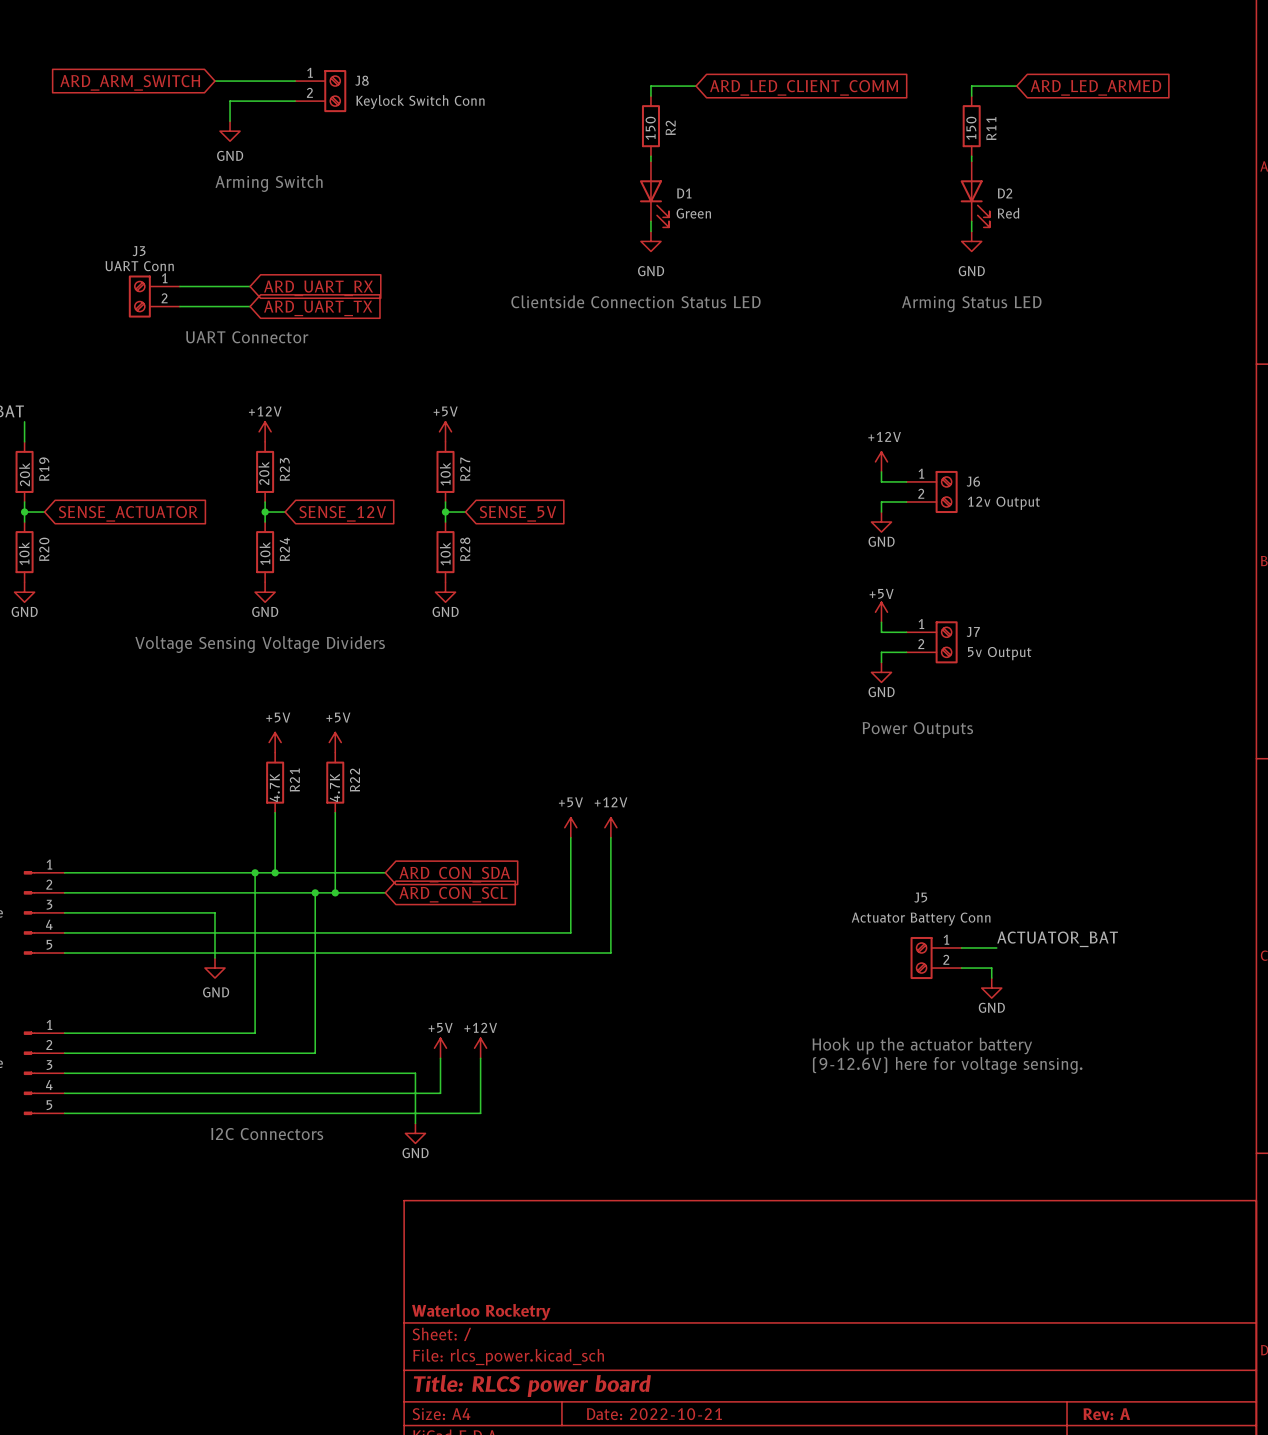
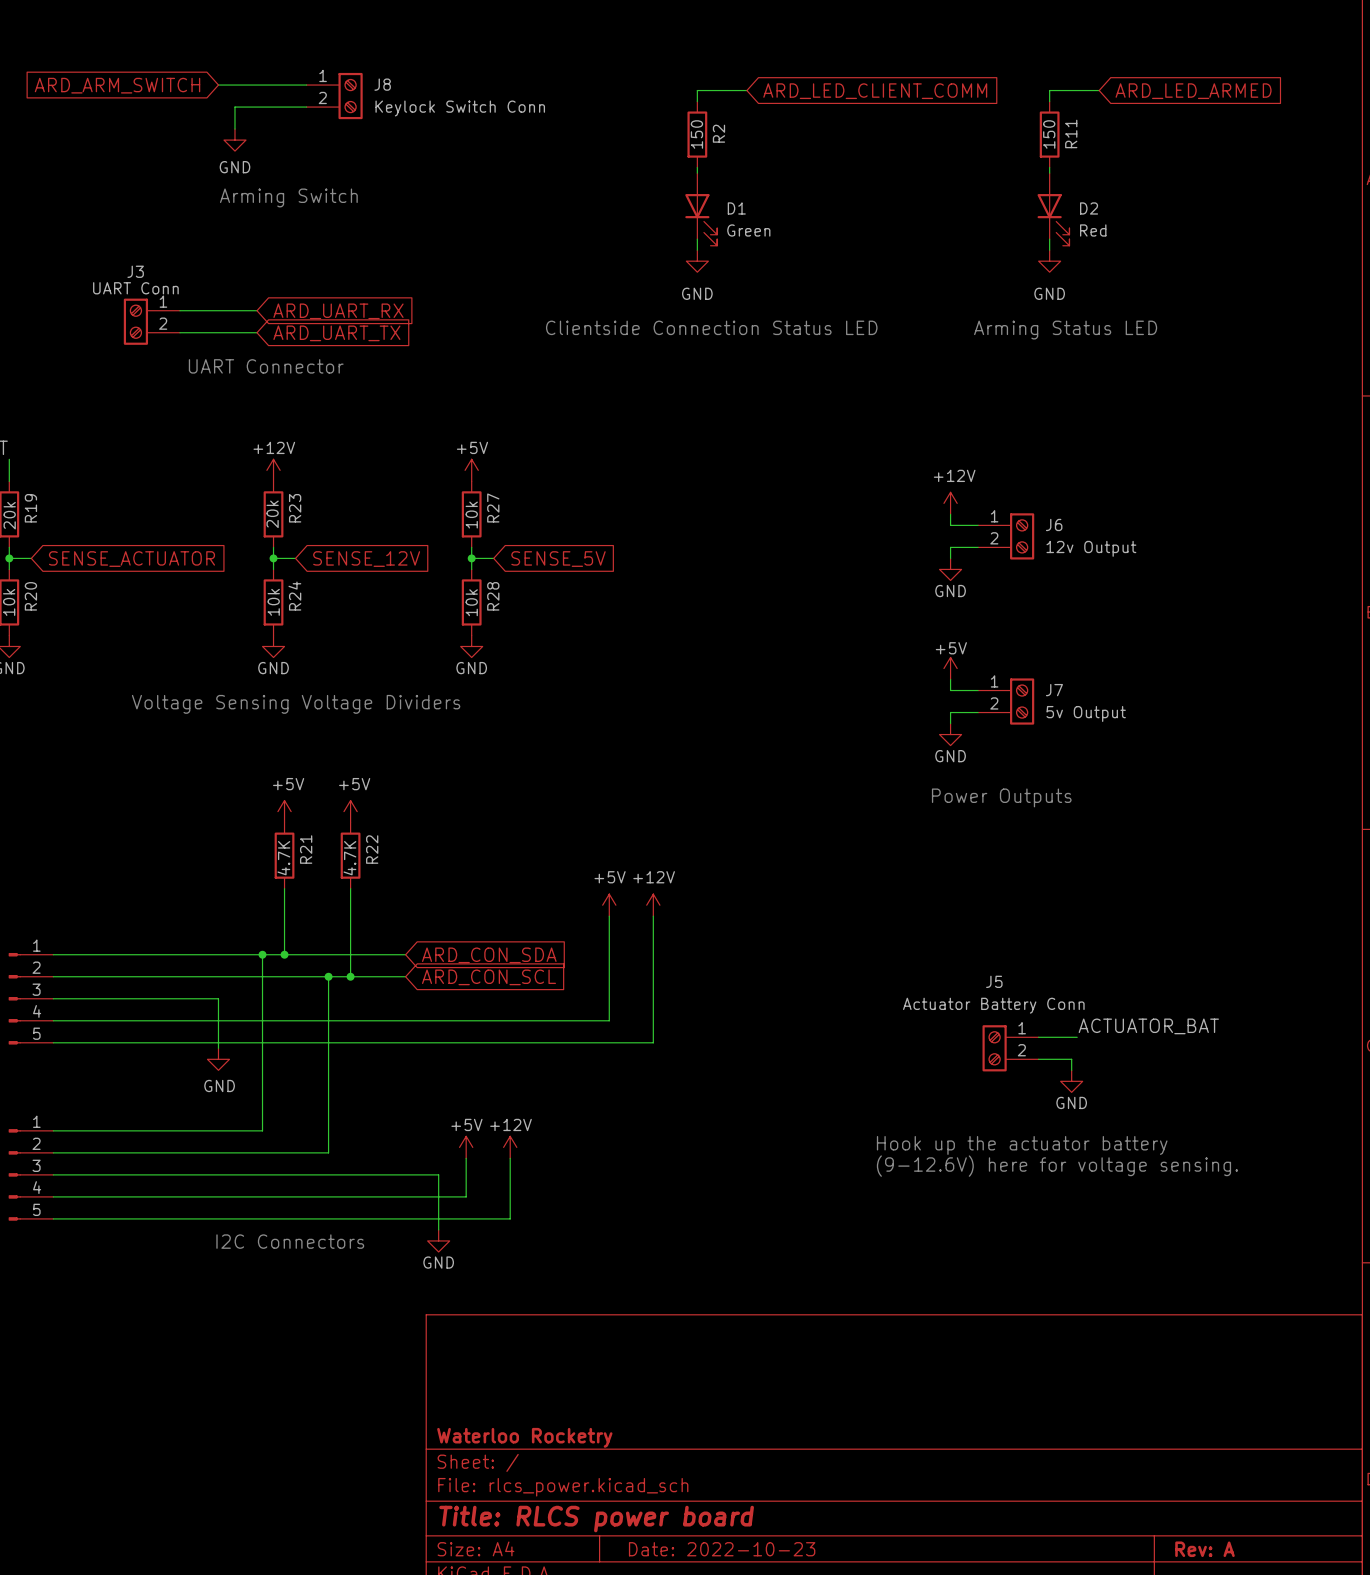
title block: Date: 2022-10-21 (654, 1414) -> Date: 2022-10-23 (722, 1549)

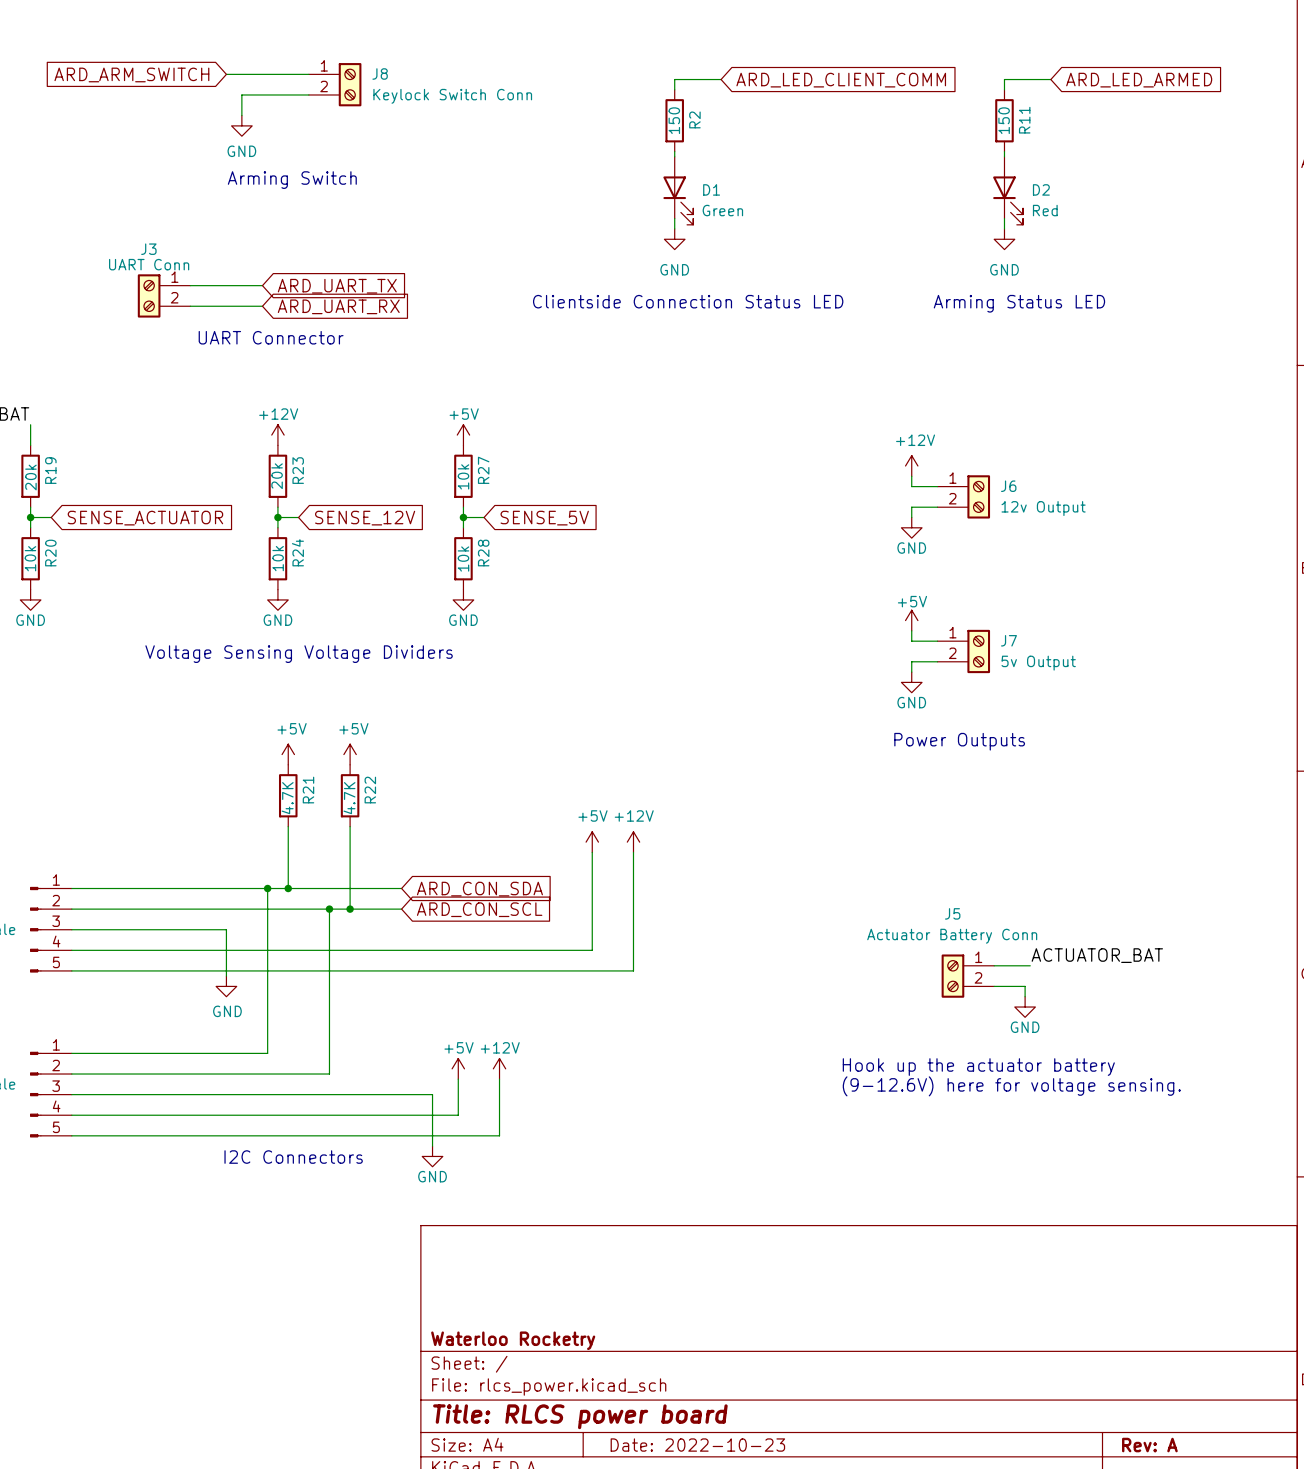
global label: ARD_UART_RX (338, 311) -> ARD_UART_TX (337, 286)
global label: ARD_UART_TX (336, 333) -> ARD_UART_RX (338, 306)

